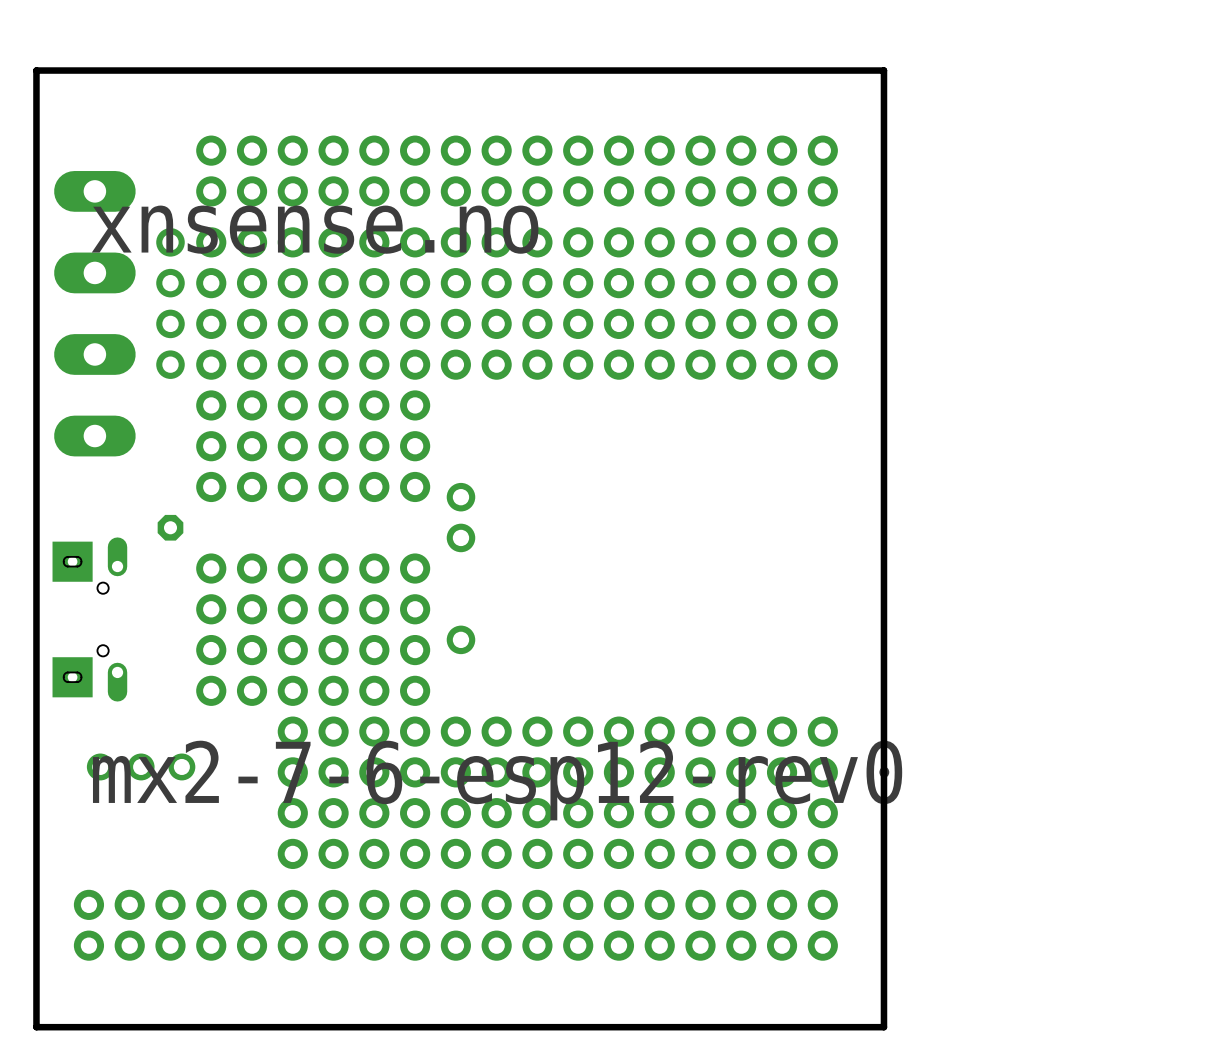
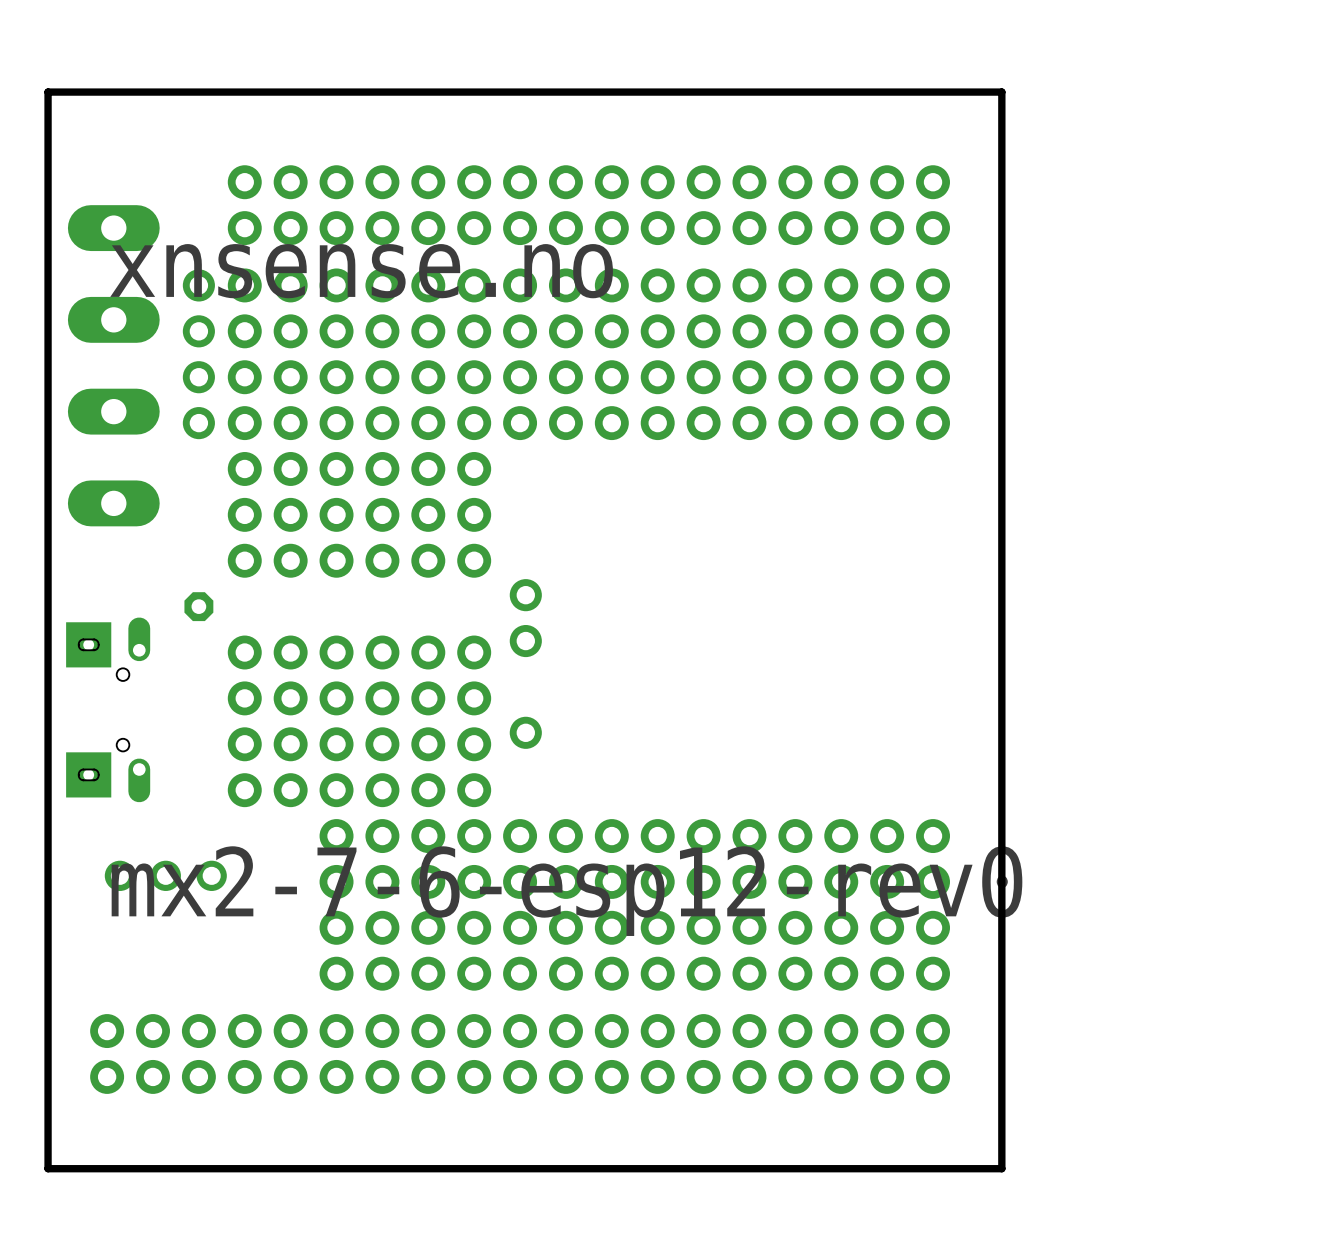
part: (460, 497) -> none
part: none -> (525, 595)
part: (460, 537) -> none
part: none -> (525, 641)

